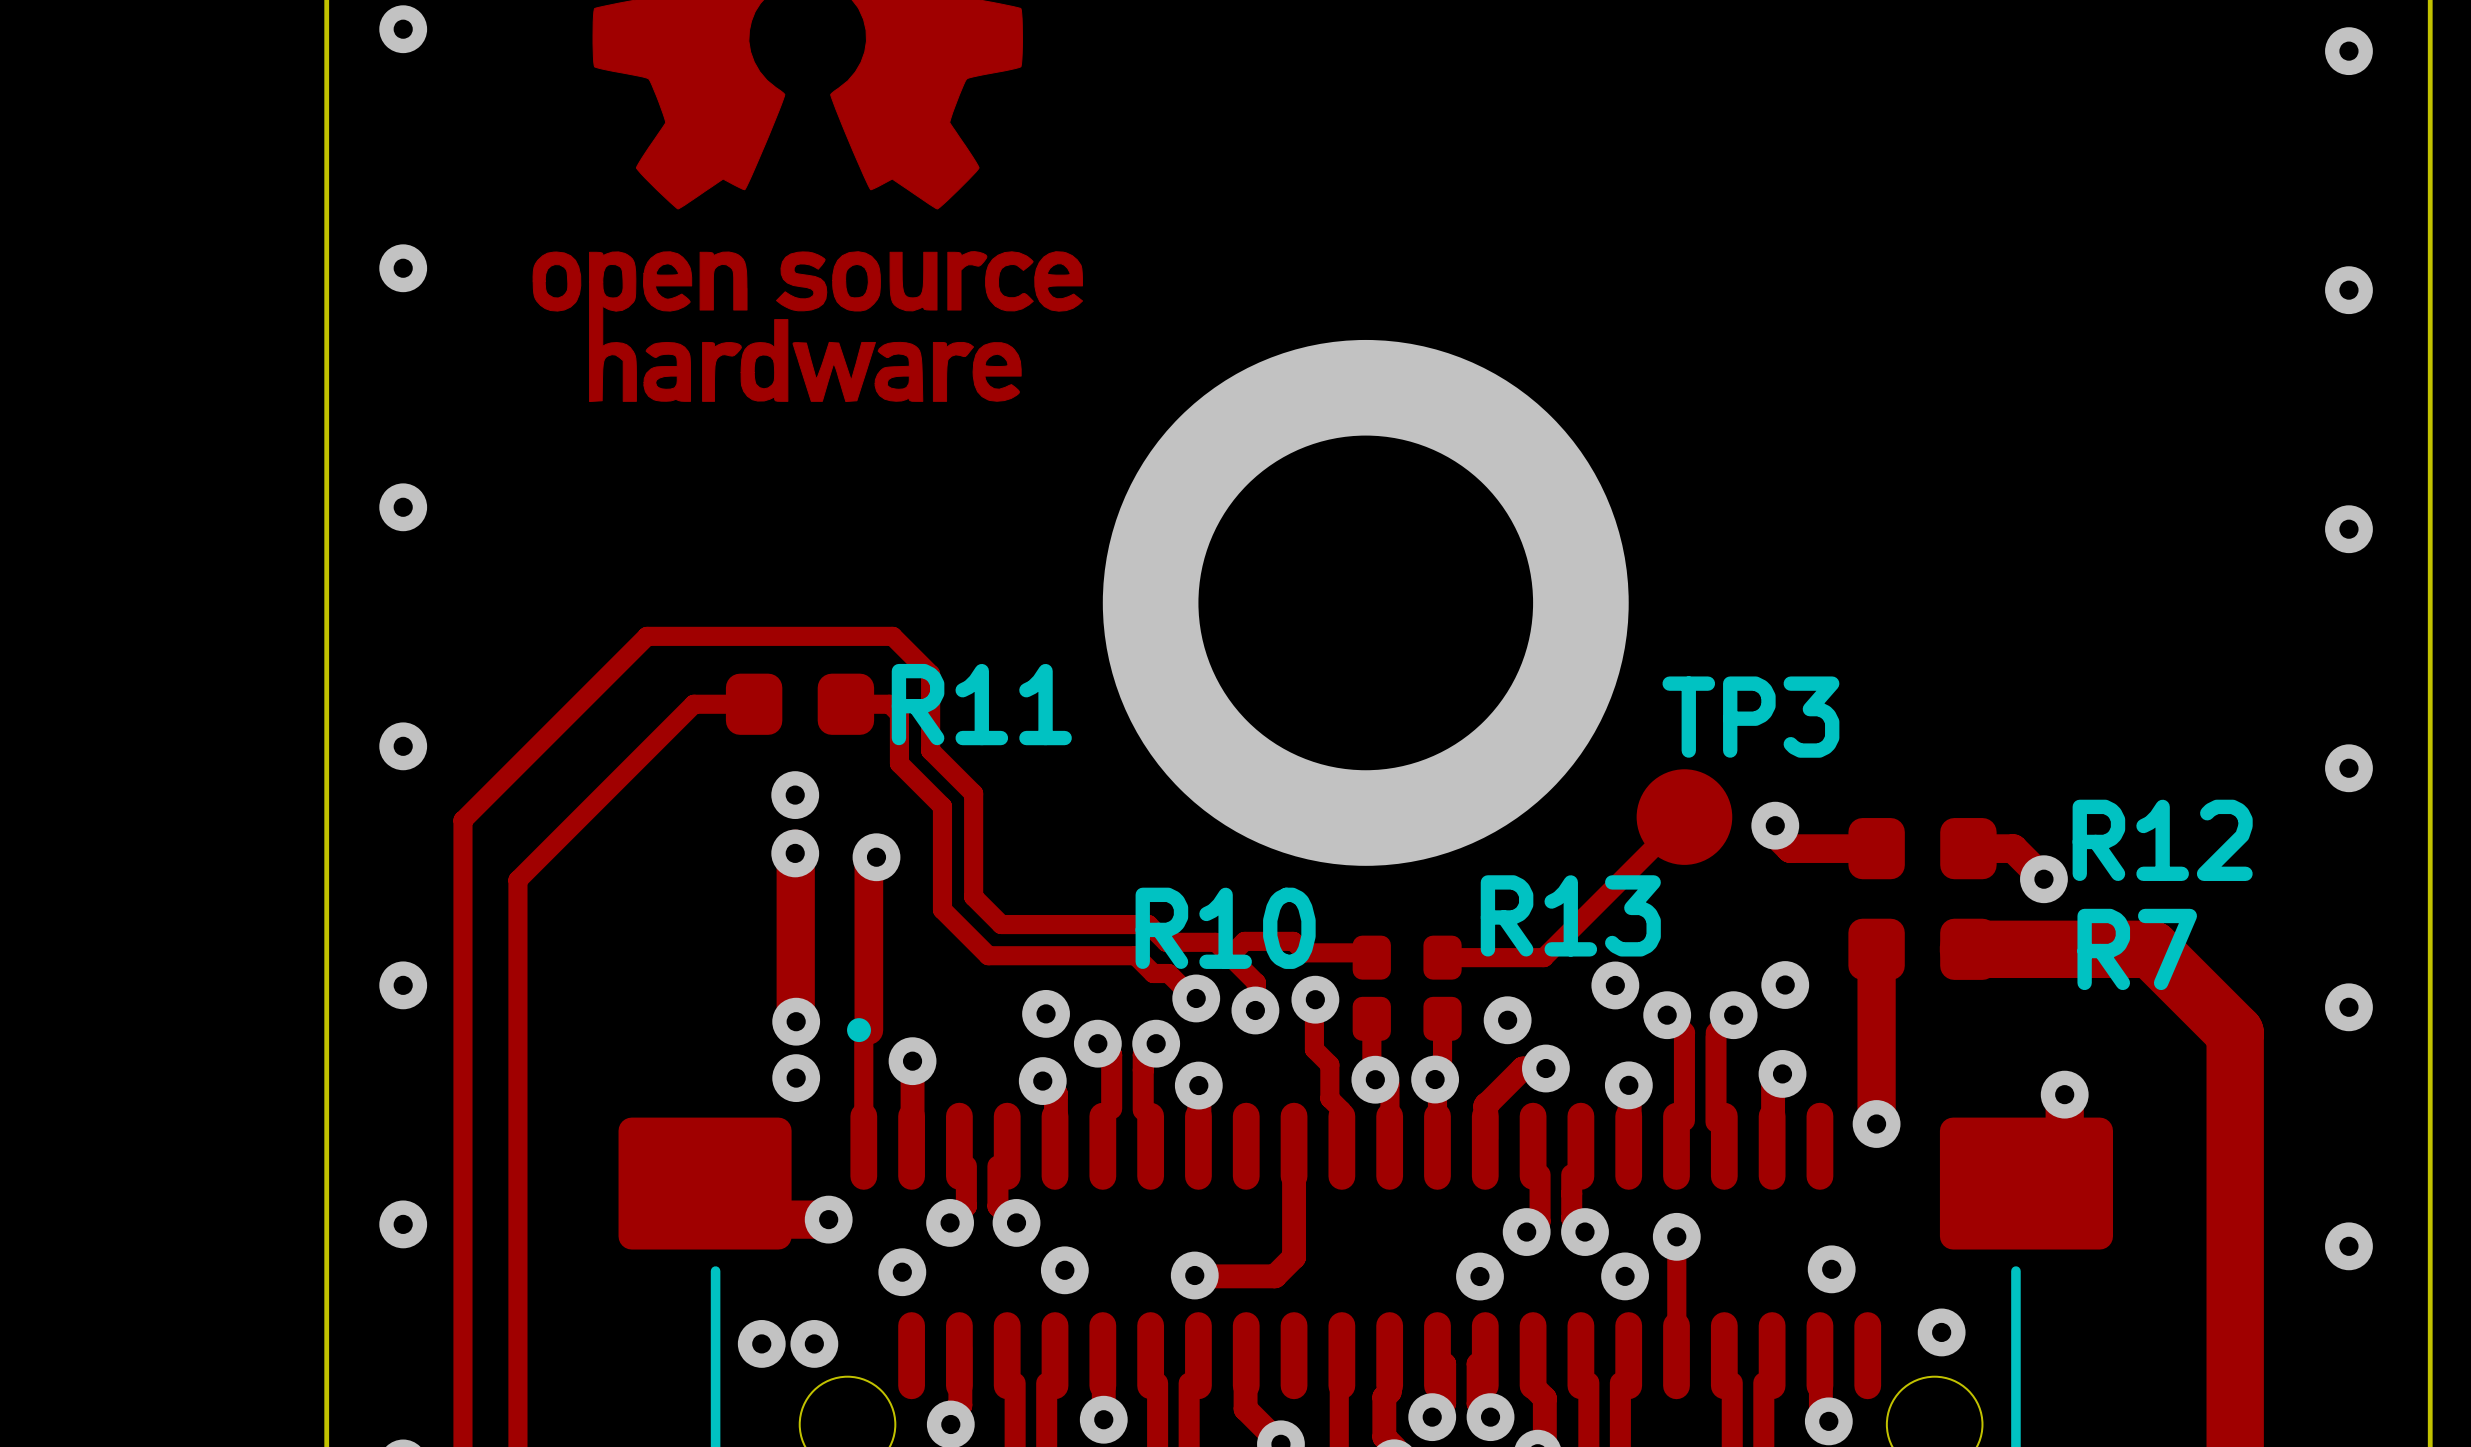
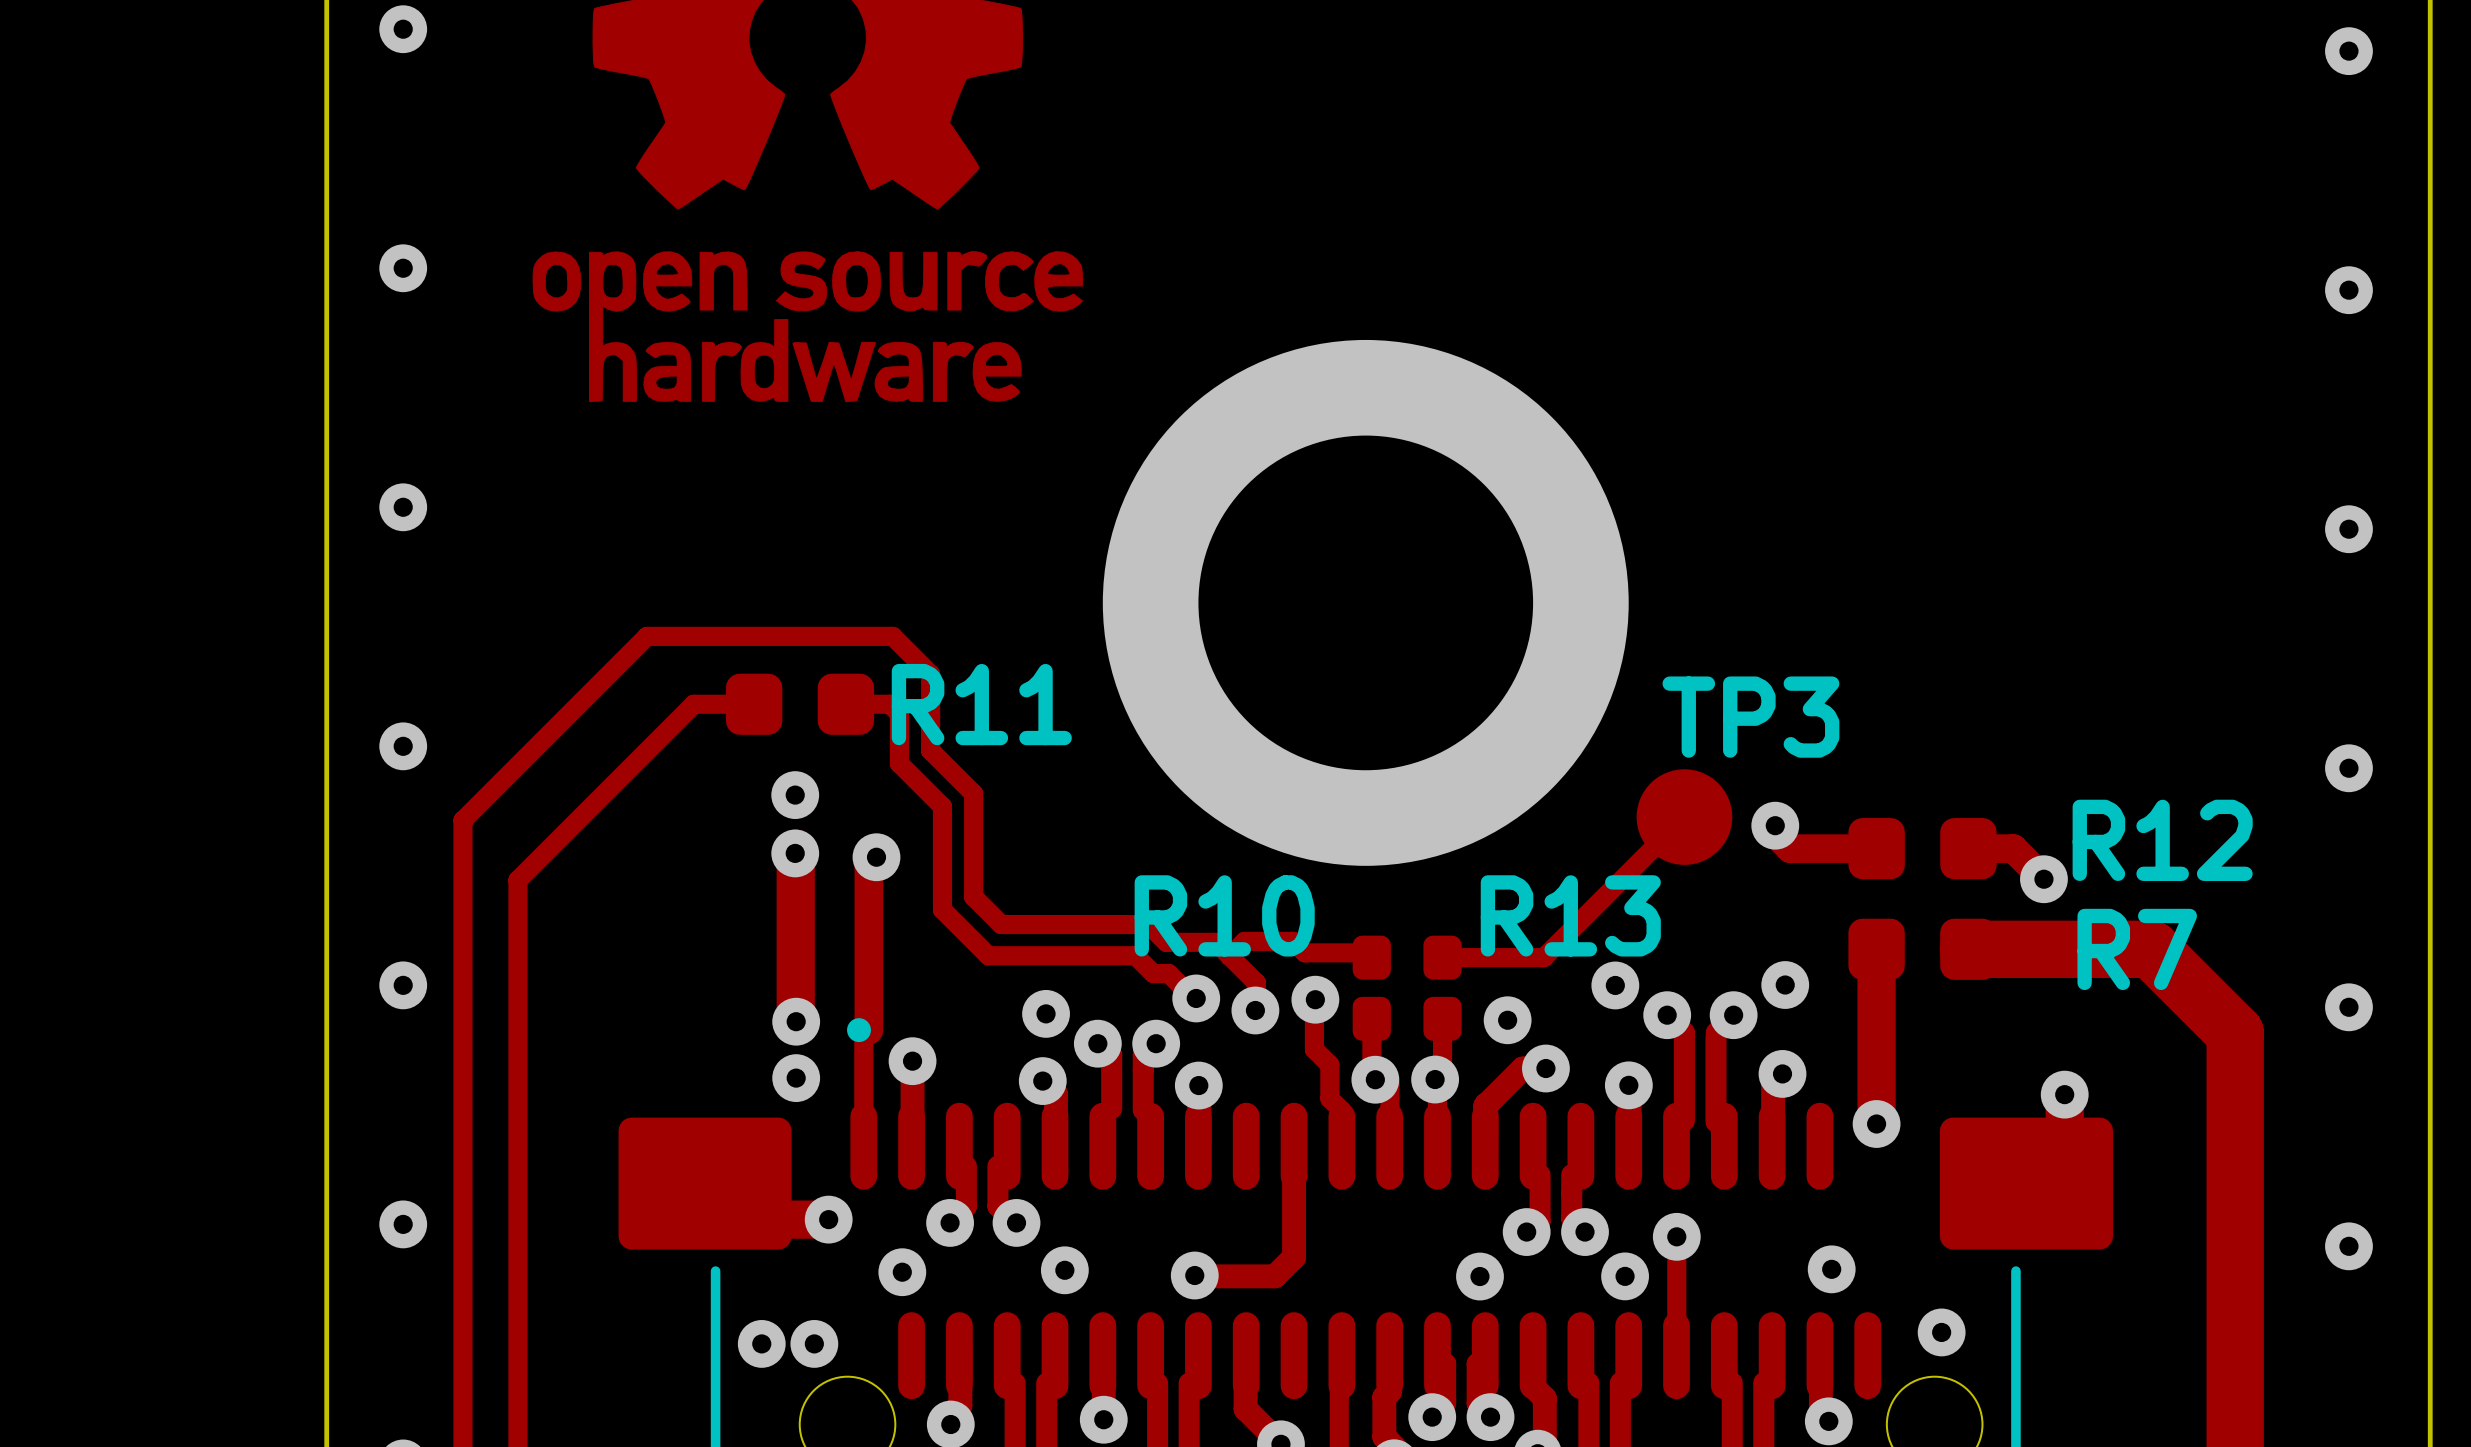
R10 name position: R10 (1225, 928) -> R10 (1224, 915)

